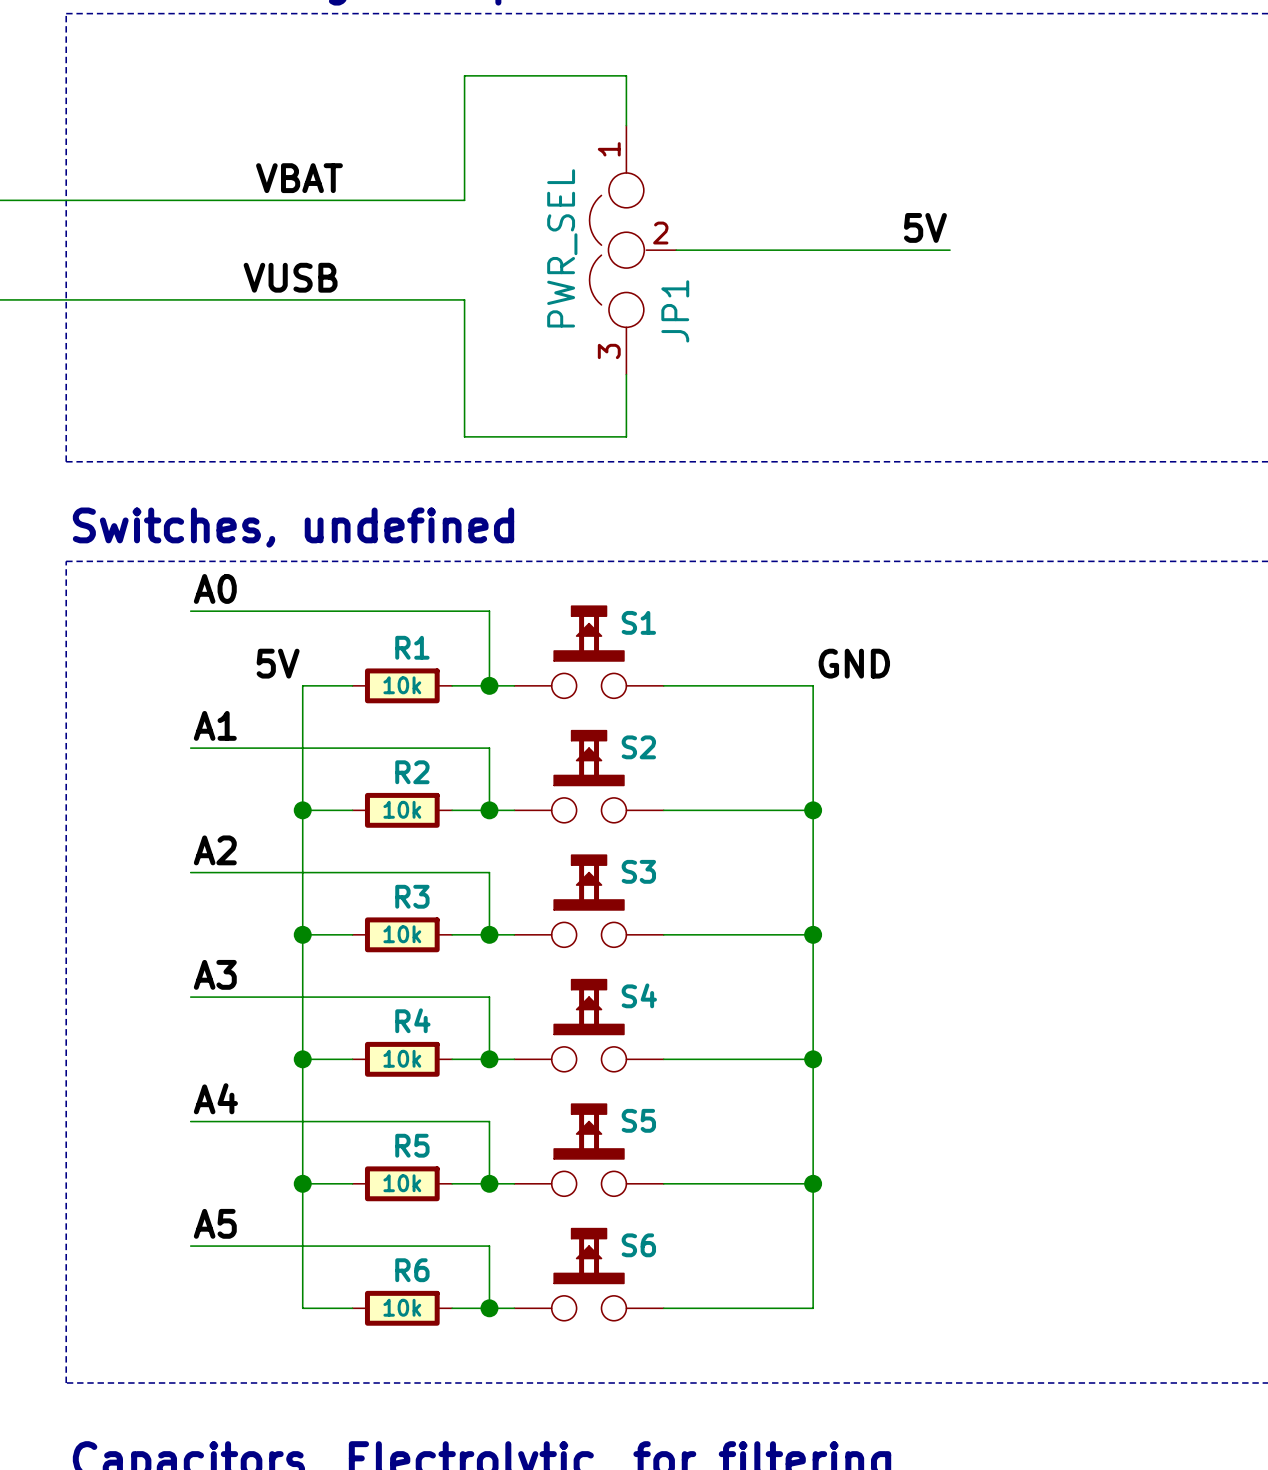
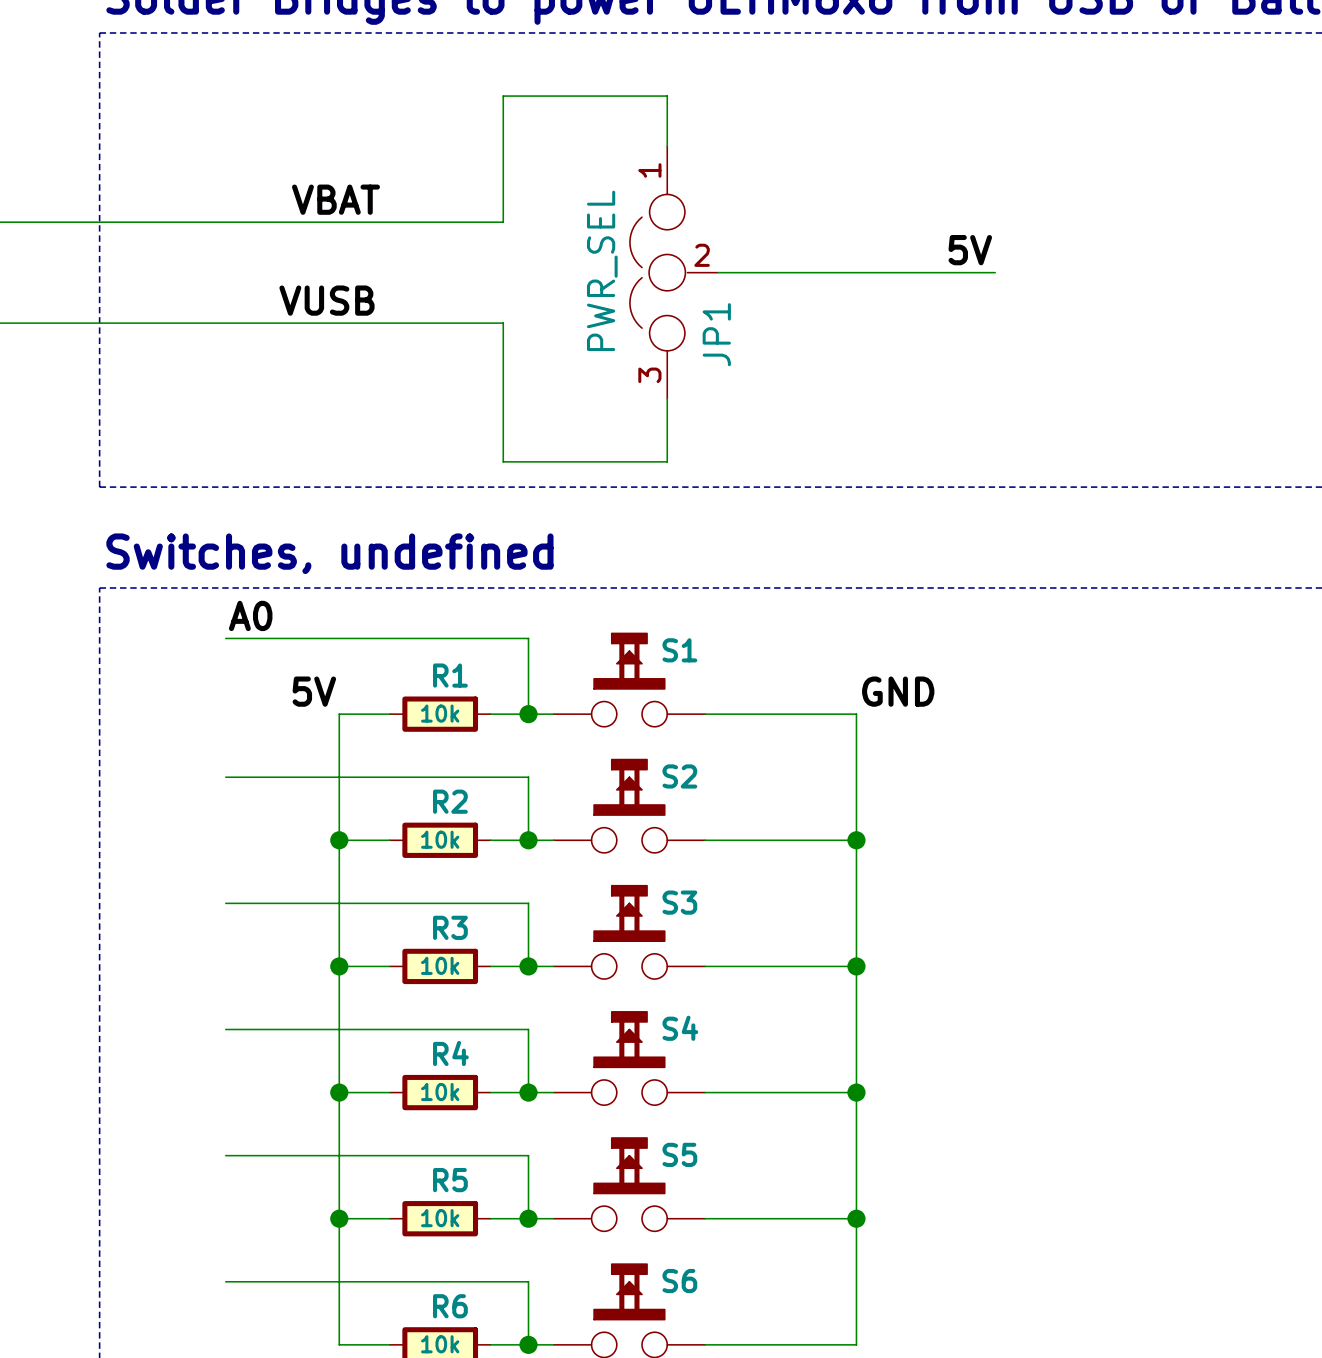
label: A1 (215, 725) -> none
label: A2 (215, 850) -> none
label: A3 (215, 974) -> none
label: A4 (215, 1098) -> none
label: A5 (215, 1223) -> none

